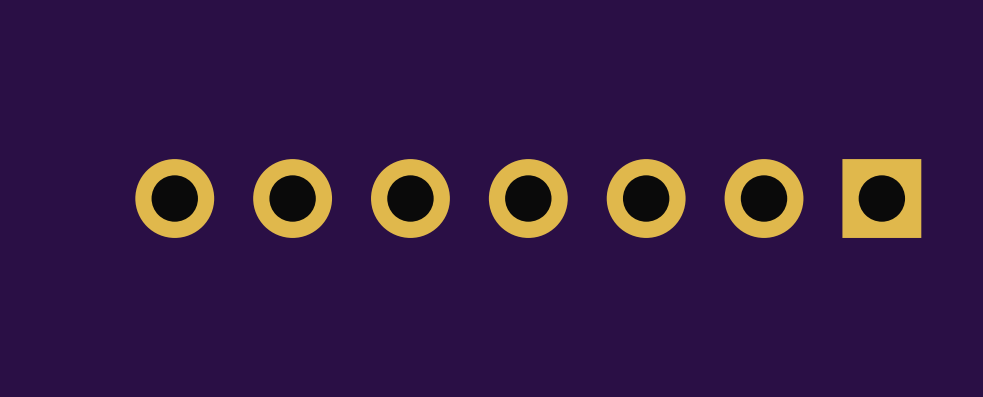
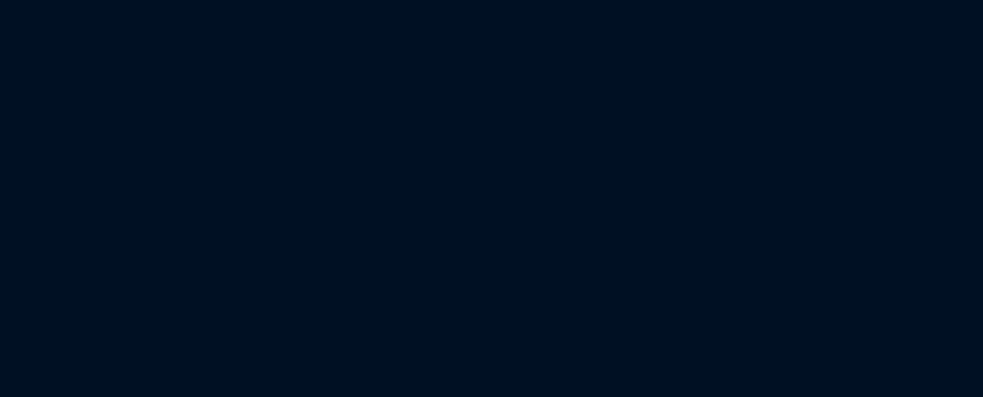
part: (528, 198) -> none

